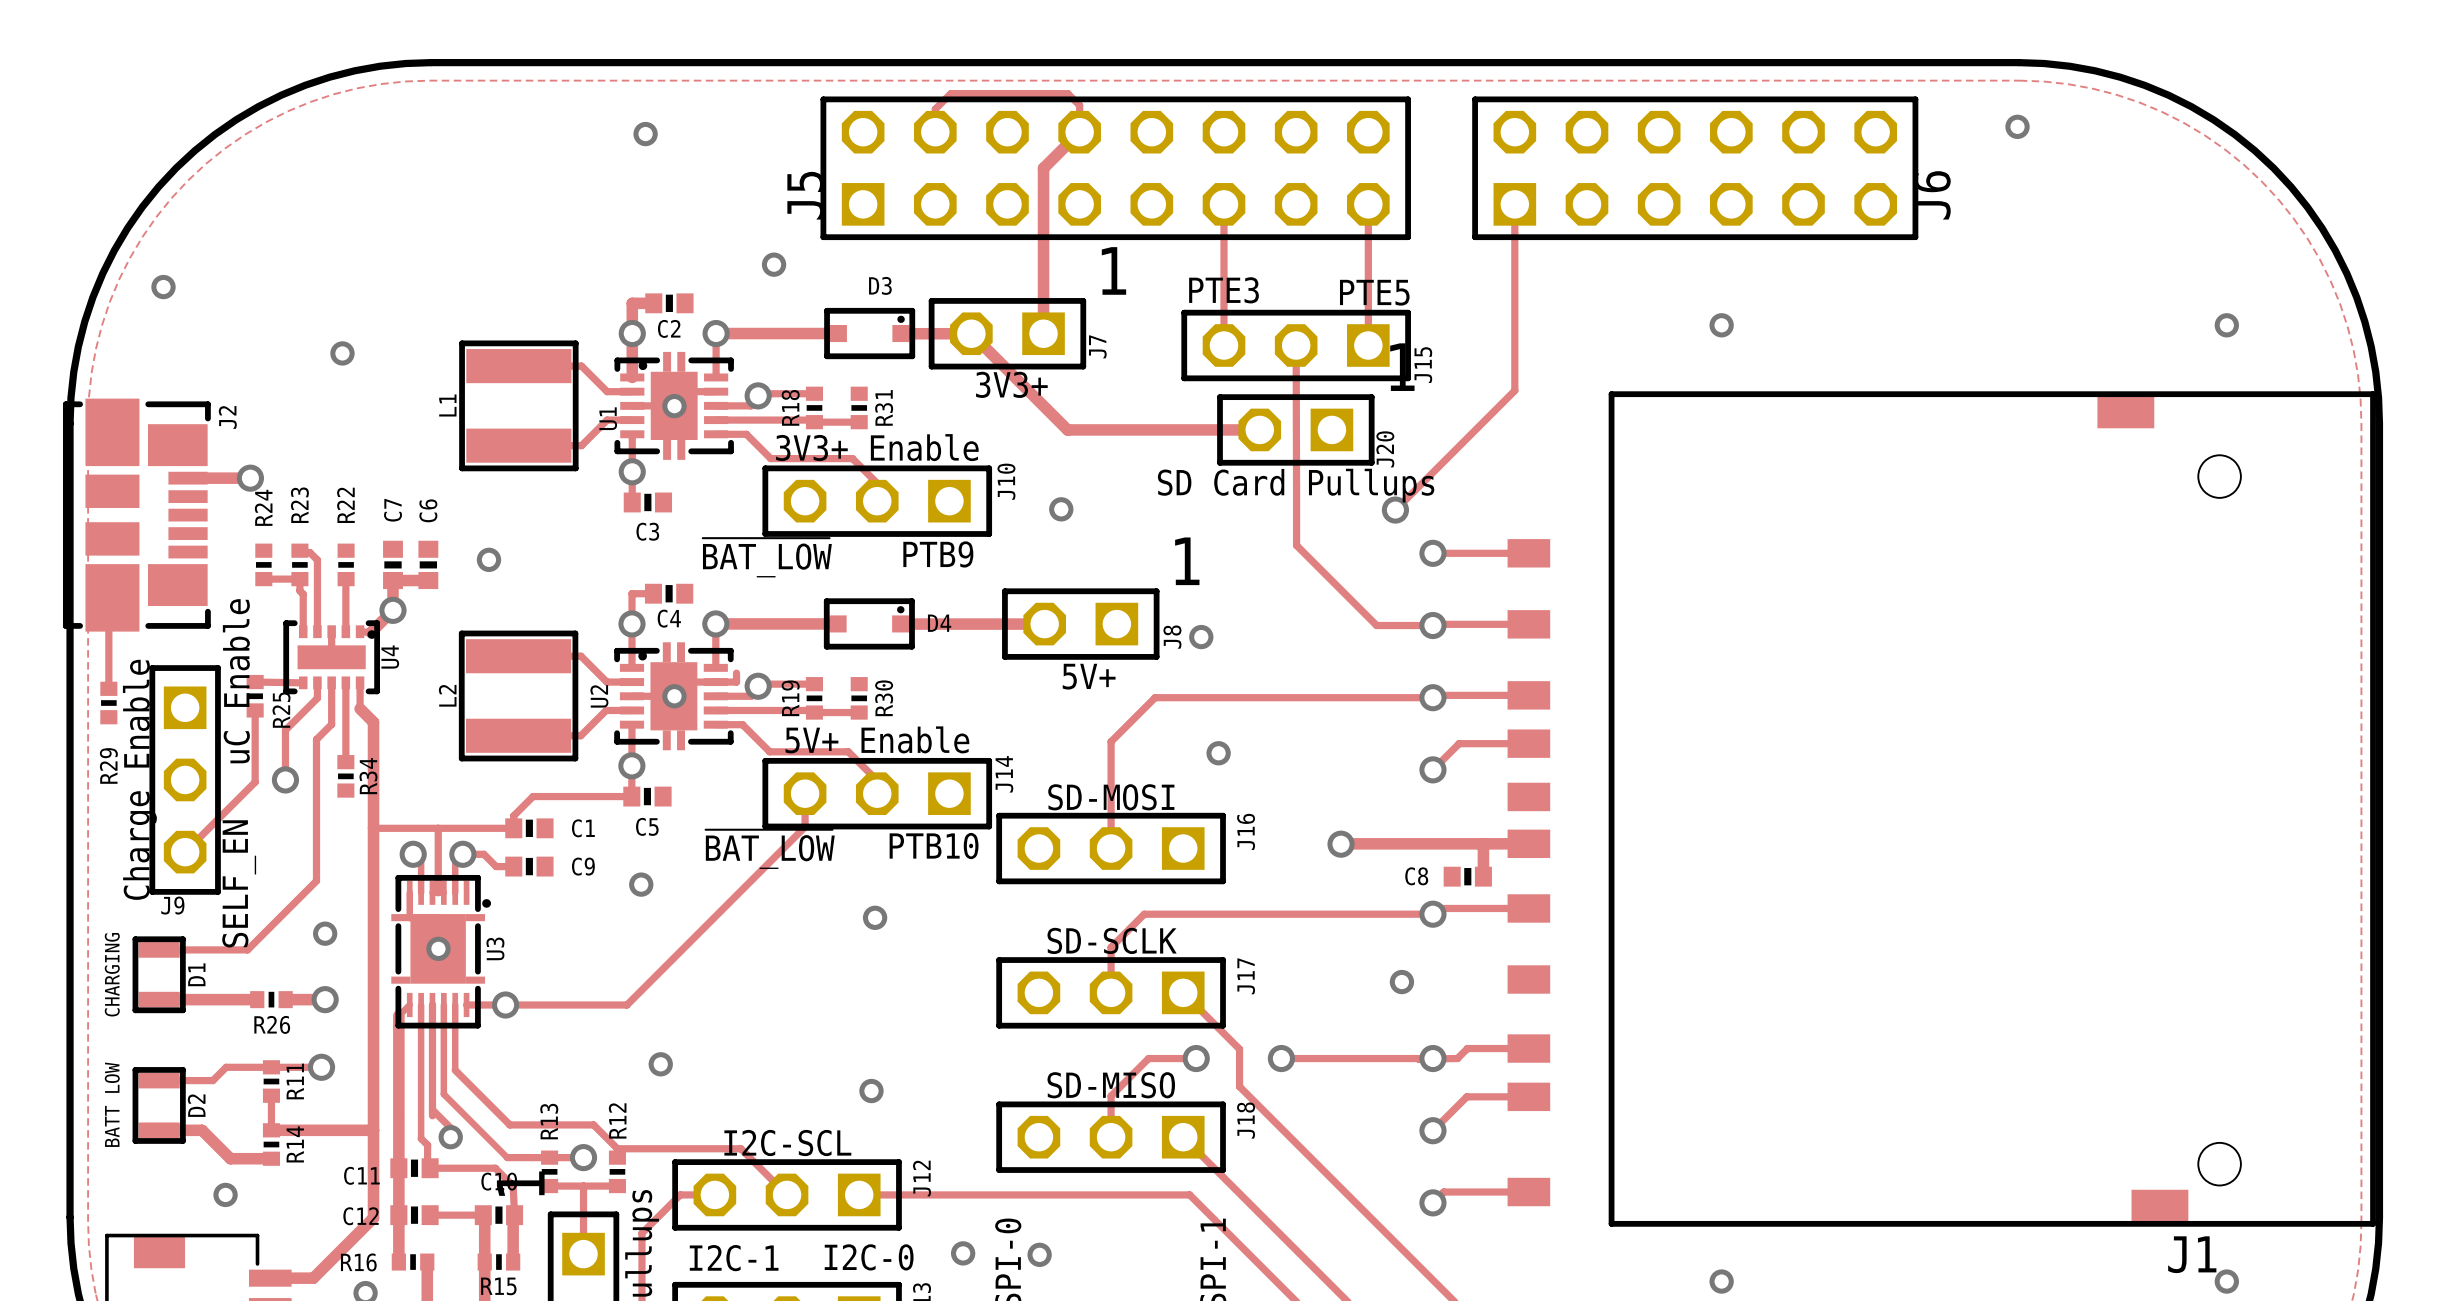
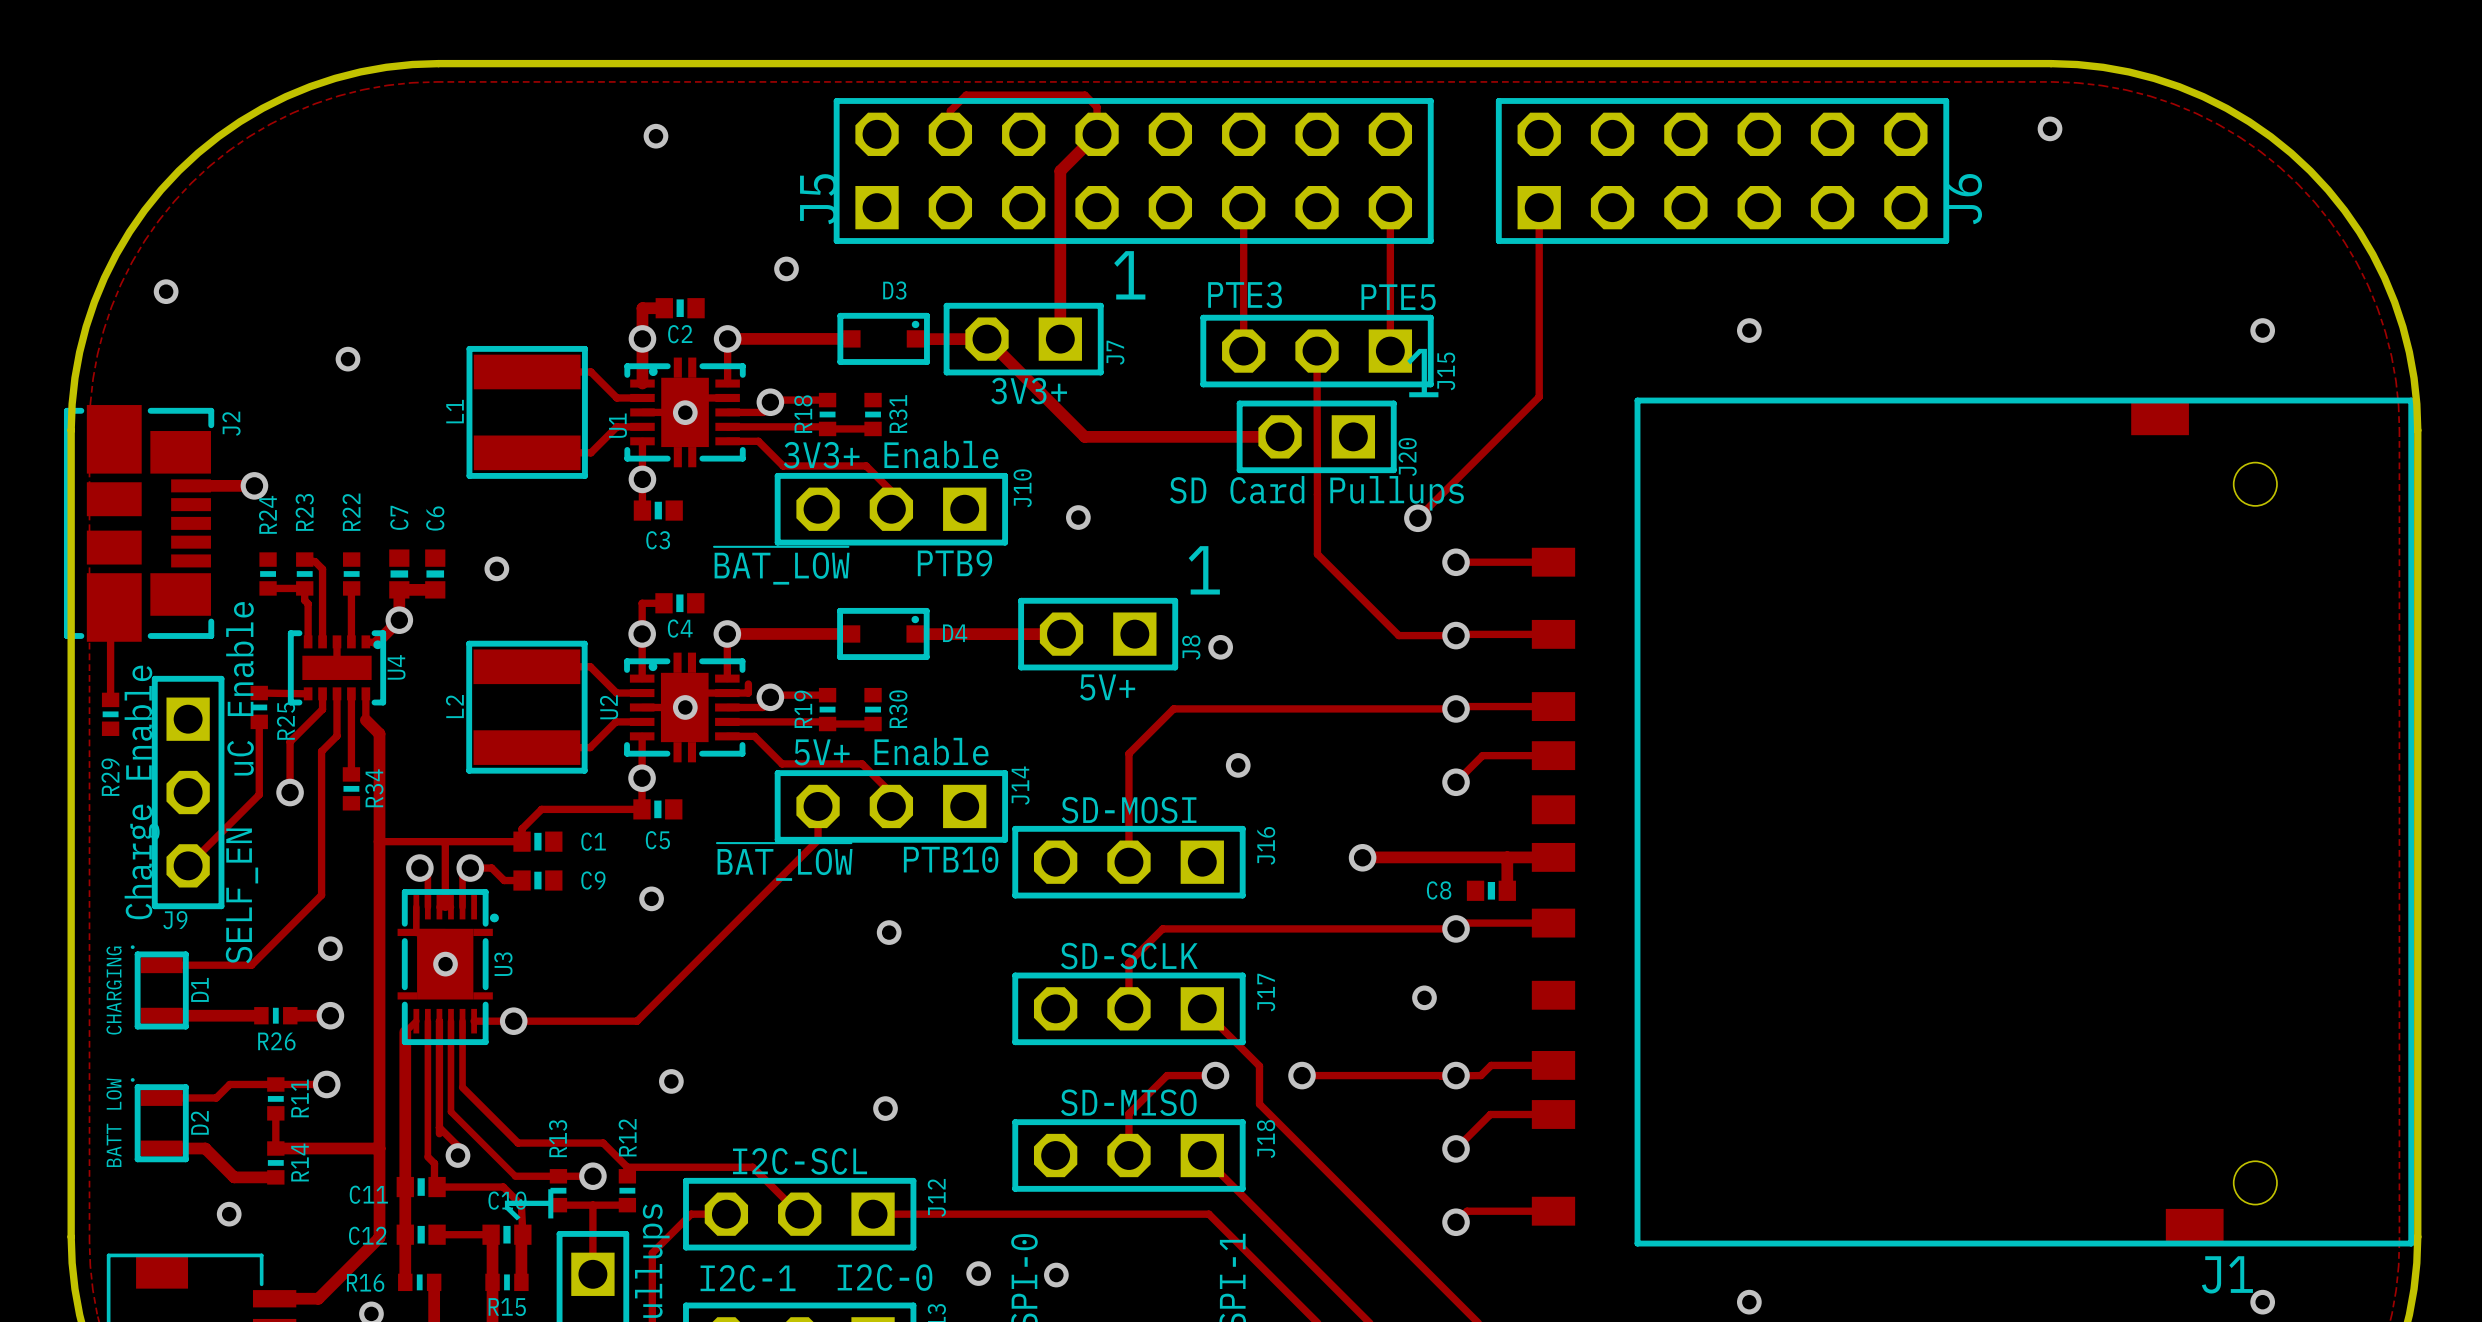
D1 footprint: [132, 936, 186, 1014] -> [130, 945, 189, 1030]
D2 footprint: [132, 1067, 186, 1144] -> [130, 1078, 189, 1163]

